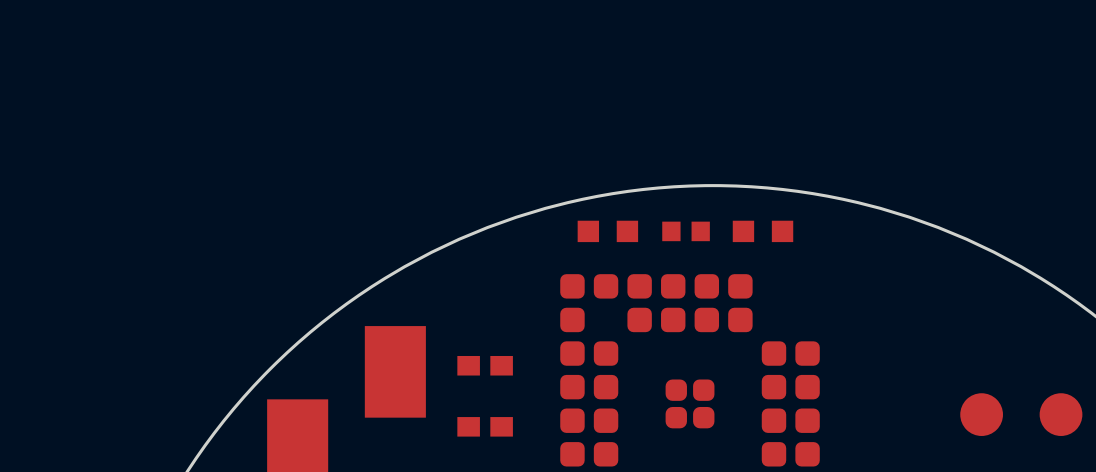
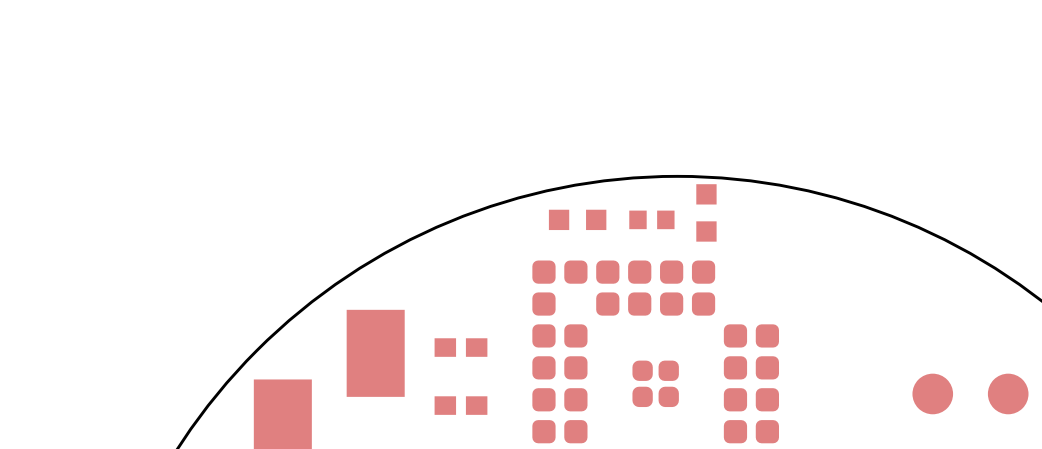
part rotation: 0° (763, 231) -> 90° clockwise (706, 212)

